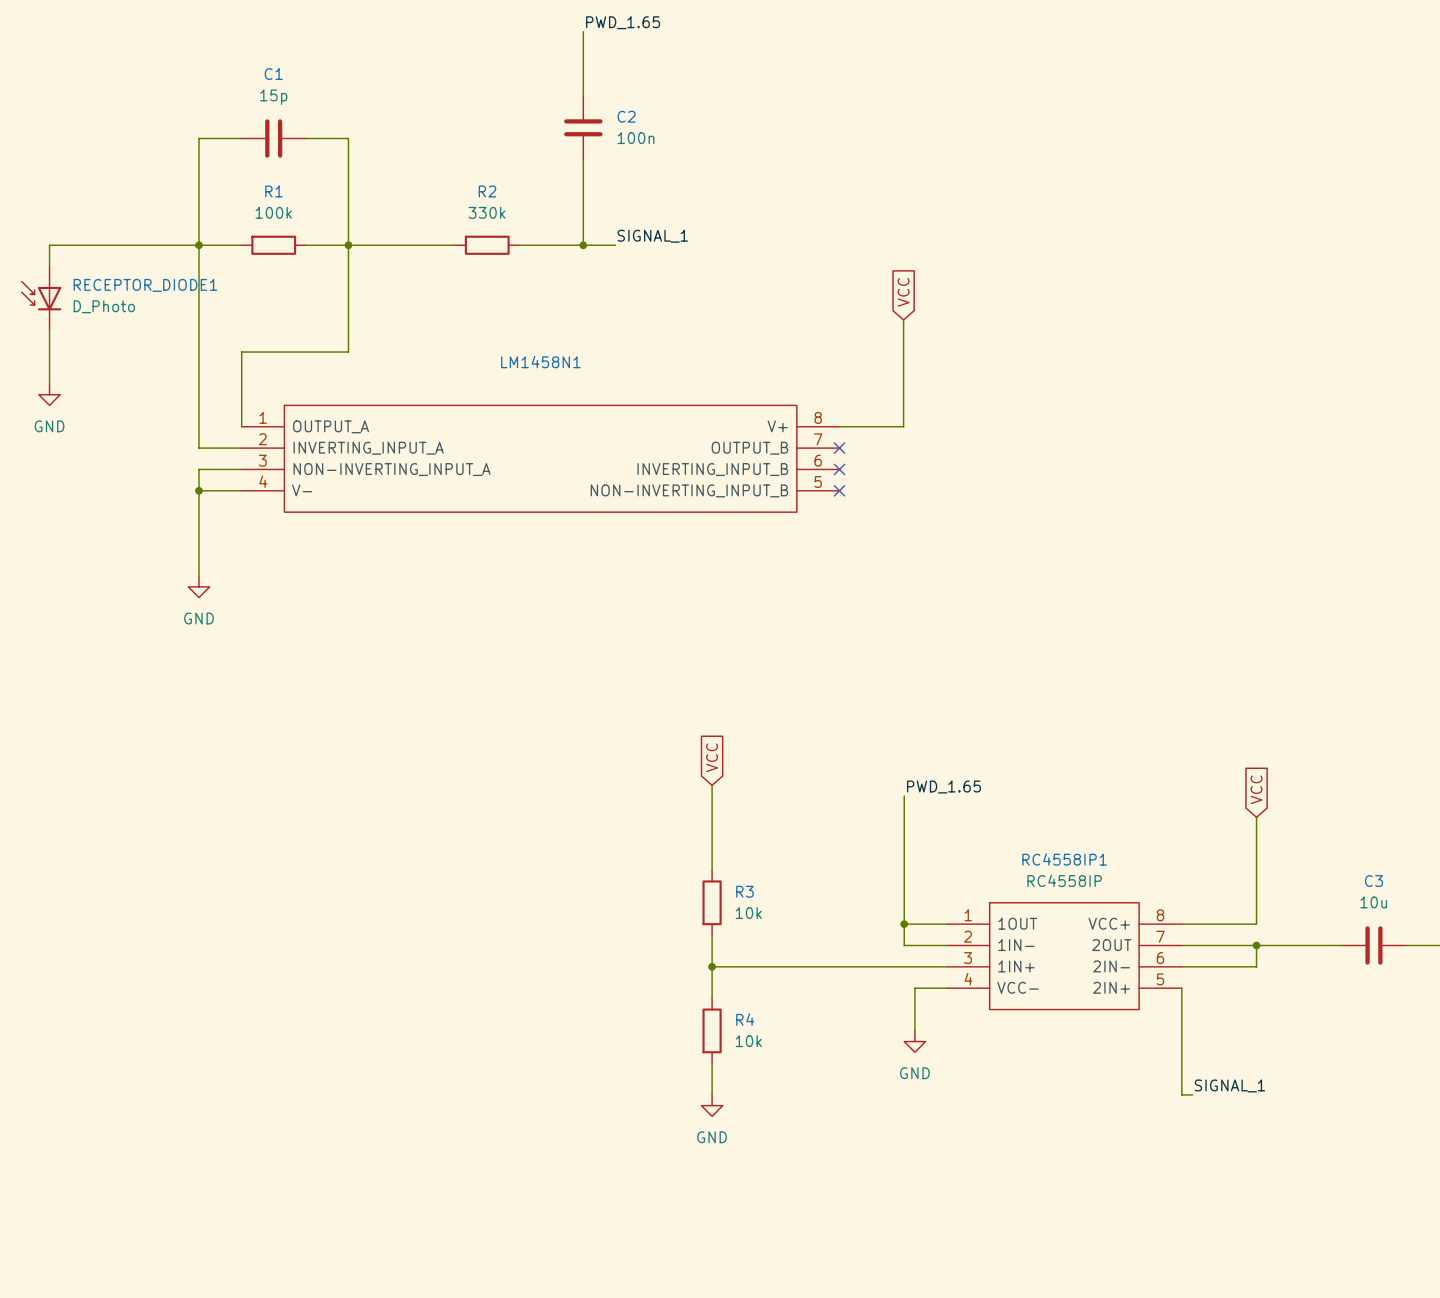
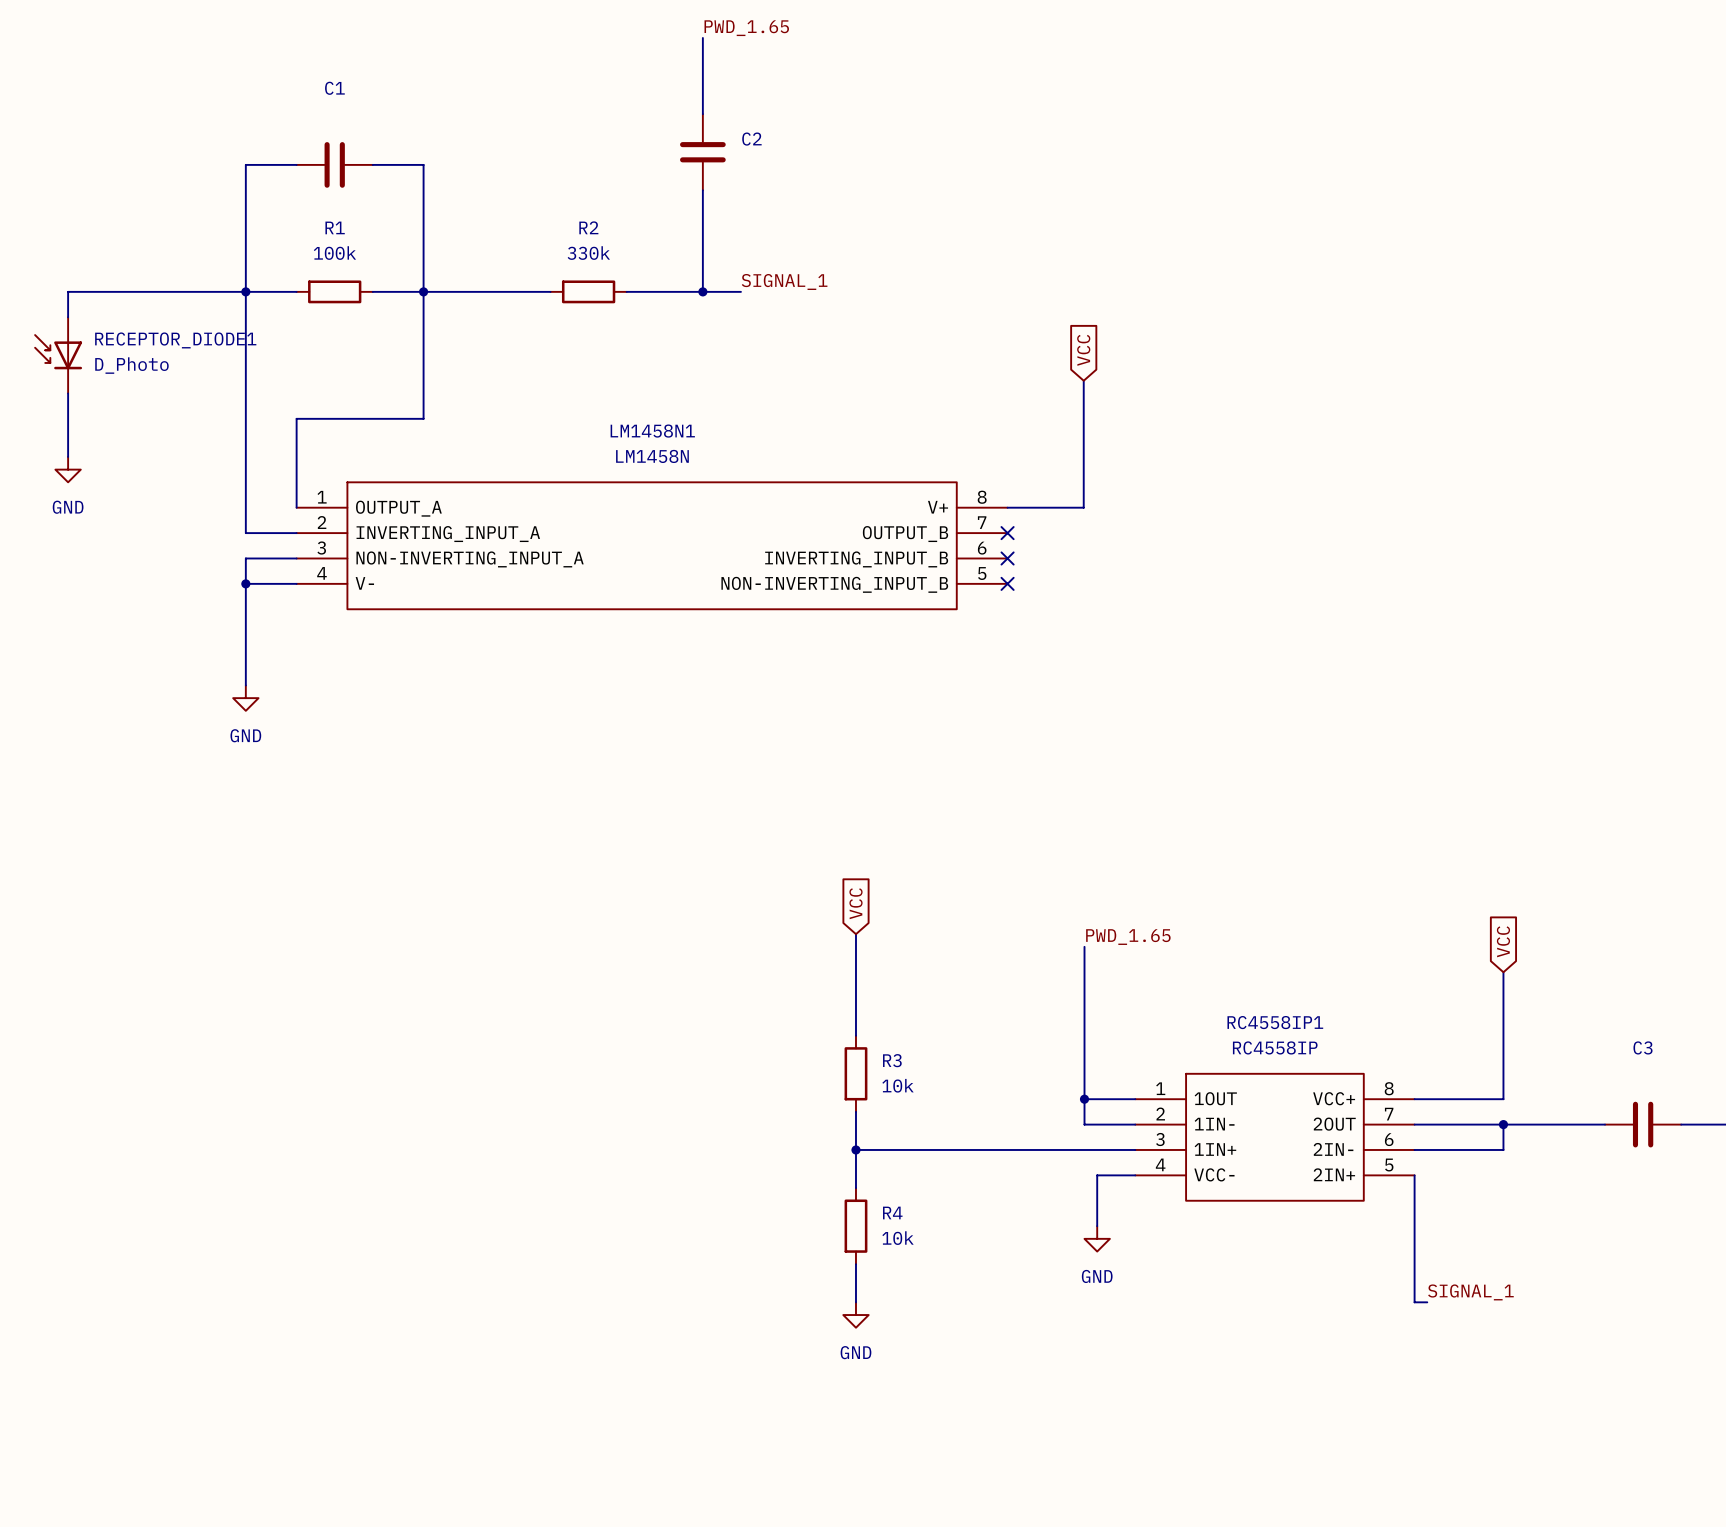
C1 value: 15p (273, 97) -> none
C2 value: 100n (636, 138) -> none
LM1458N1 value: none -> LM1458N (652, 456)
C3 value: 10u (1373, 902) -> none

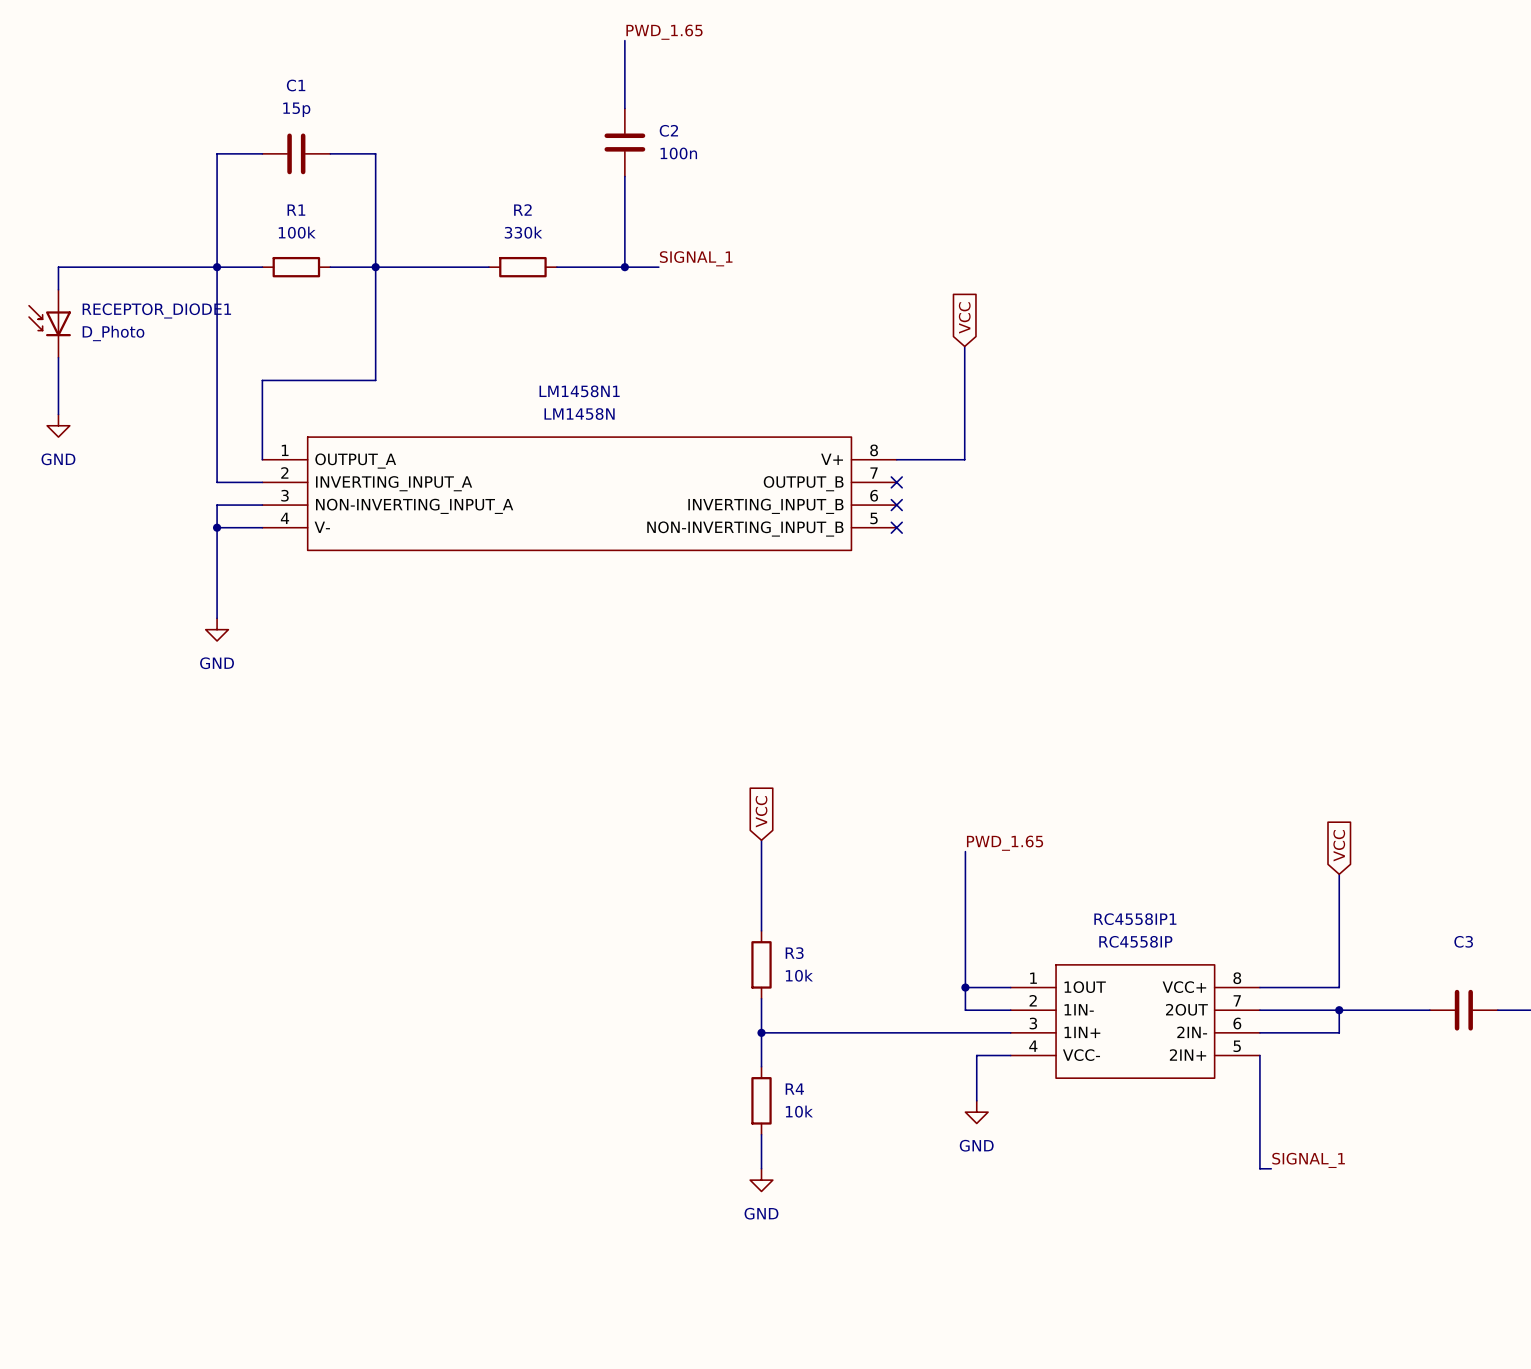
C1 value: none -> 15p (296, 109)
C2 value: none -> 100n (678, 153)

